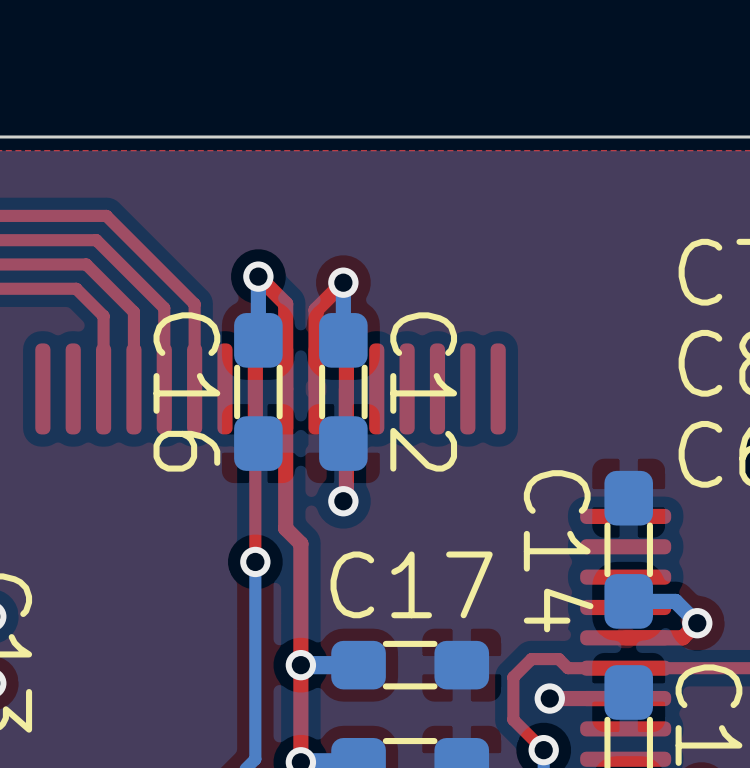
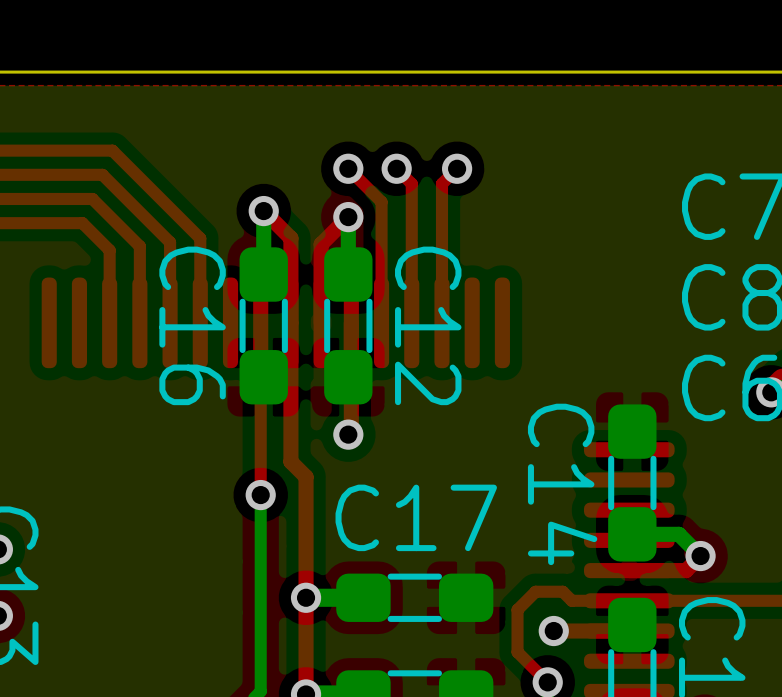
top track: none -> (348, 168) (381, 202) (381, 322)
via: none -> (348, 168)
top track: none -> (396, 168) (411, 183) (411, 322)
via: none -> (396, 168)
top track: none -> (457, 168) (441, 183) (441, 322)
via: none -> (457, 168)

